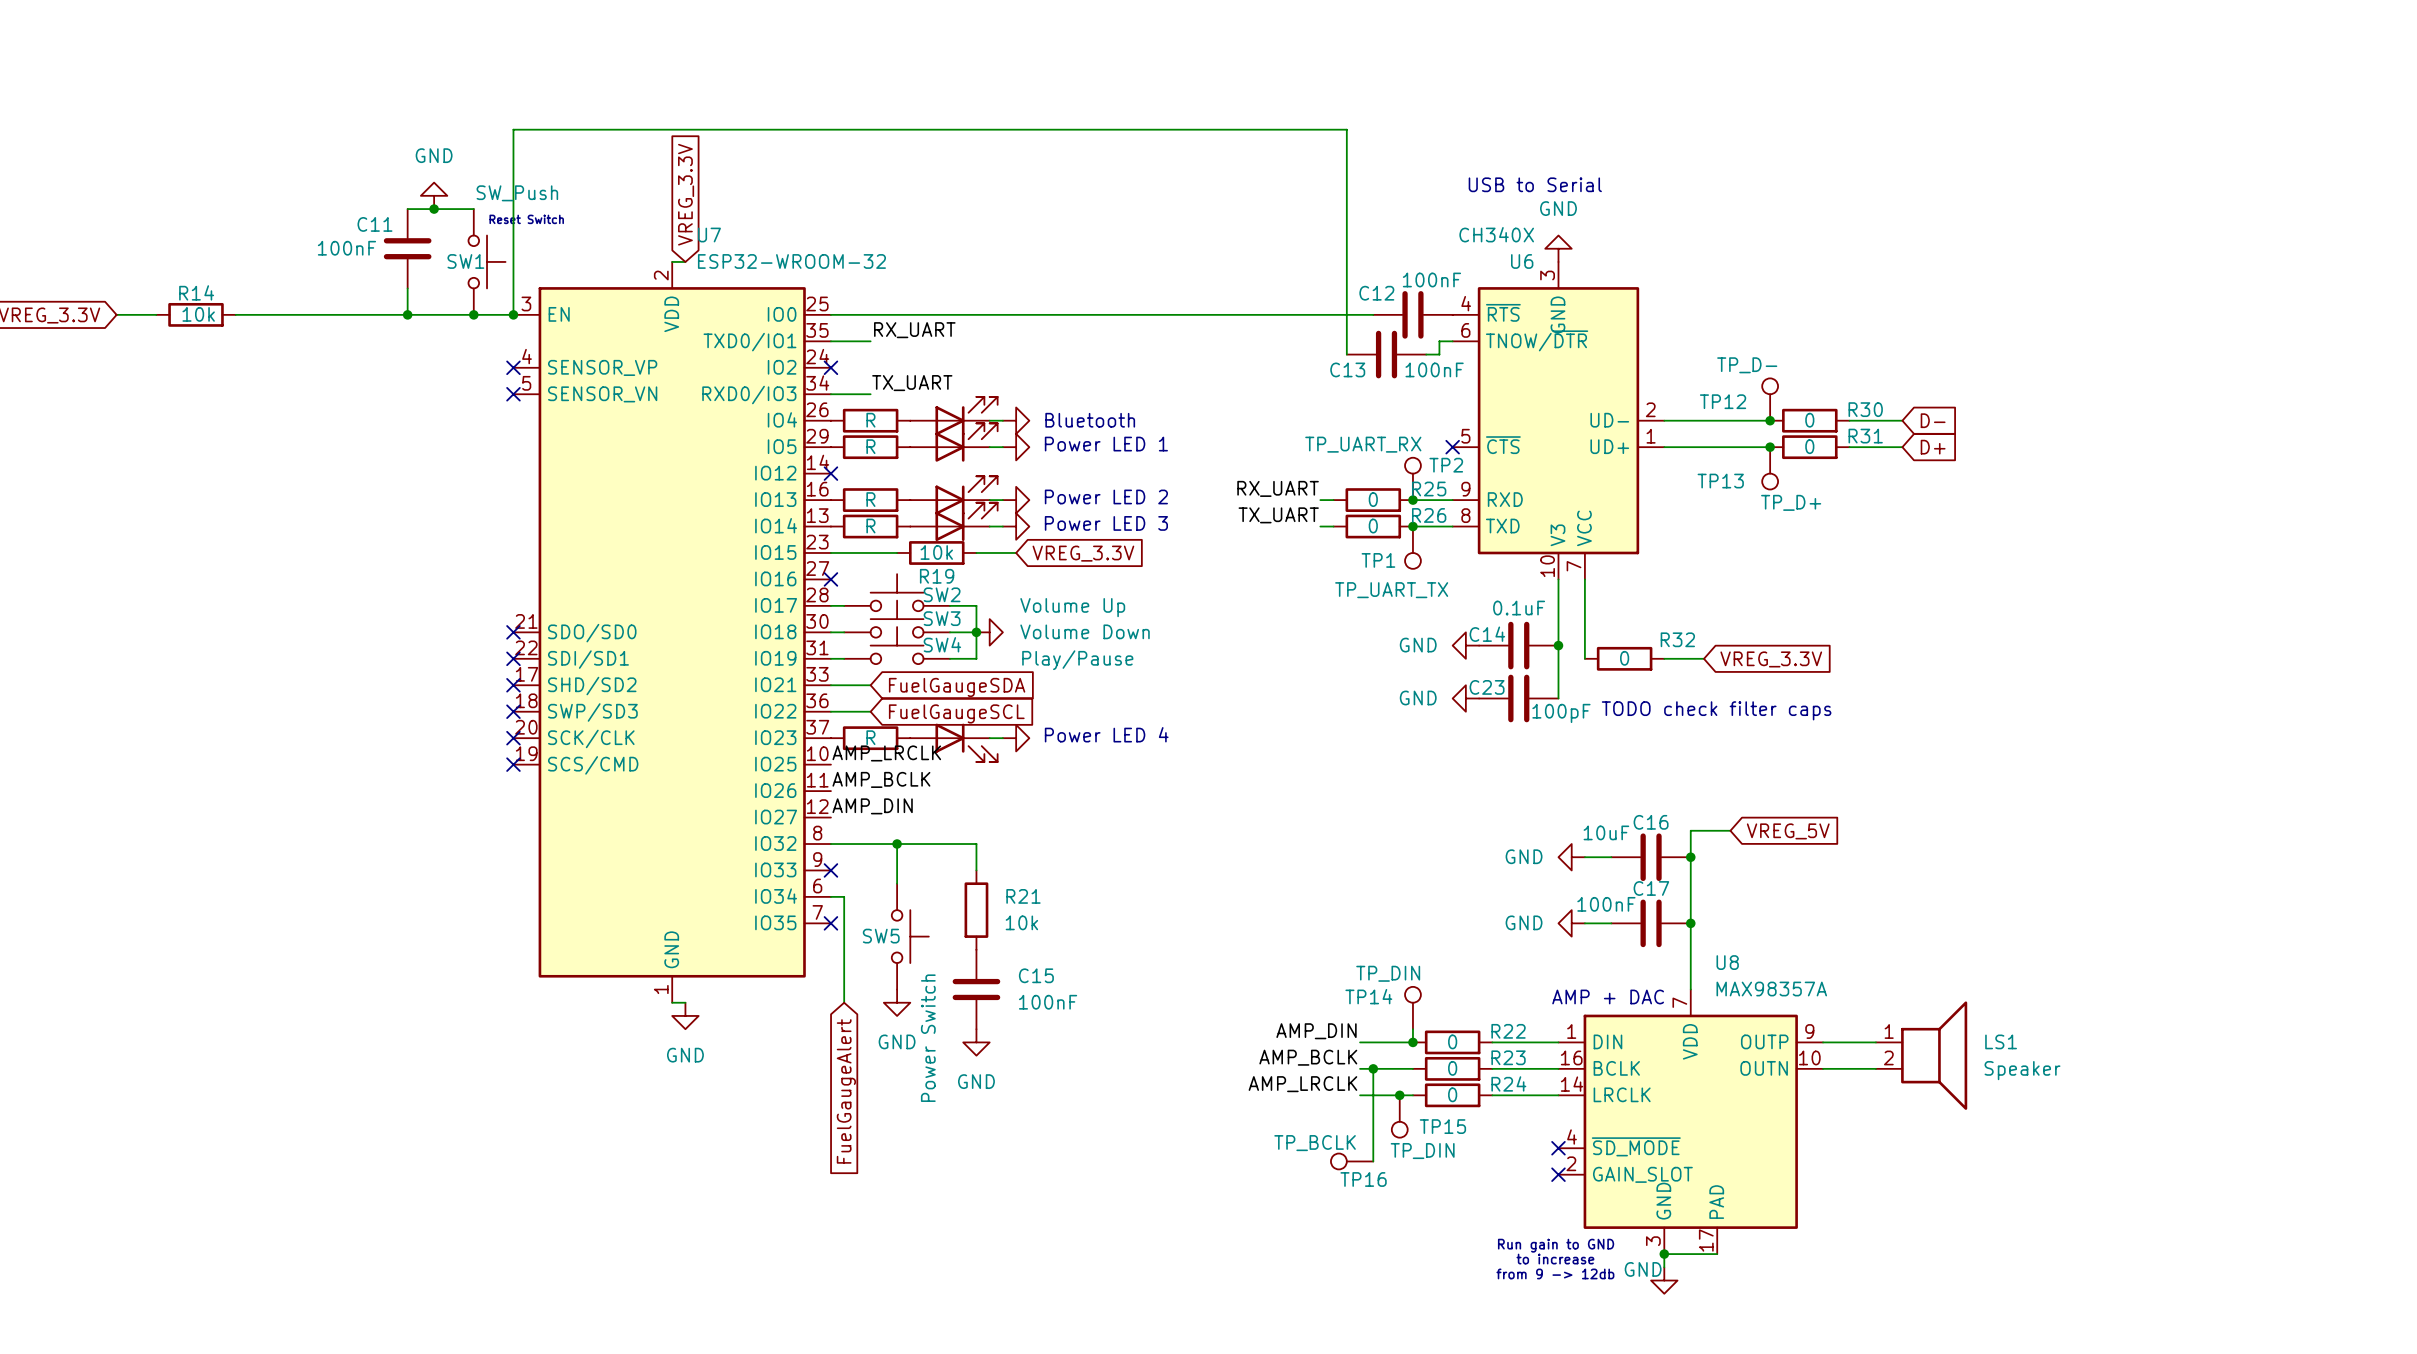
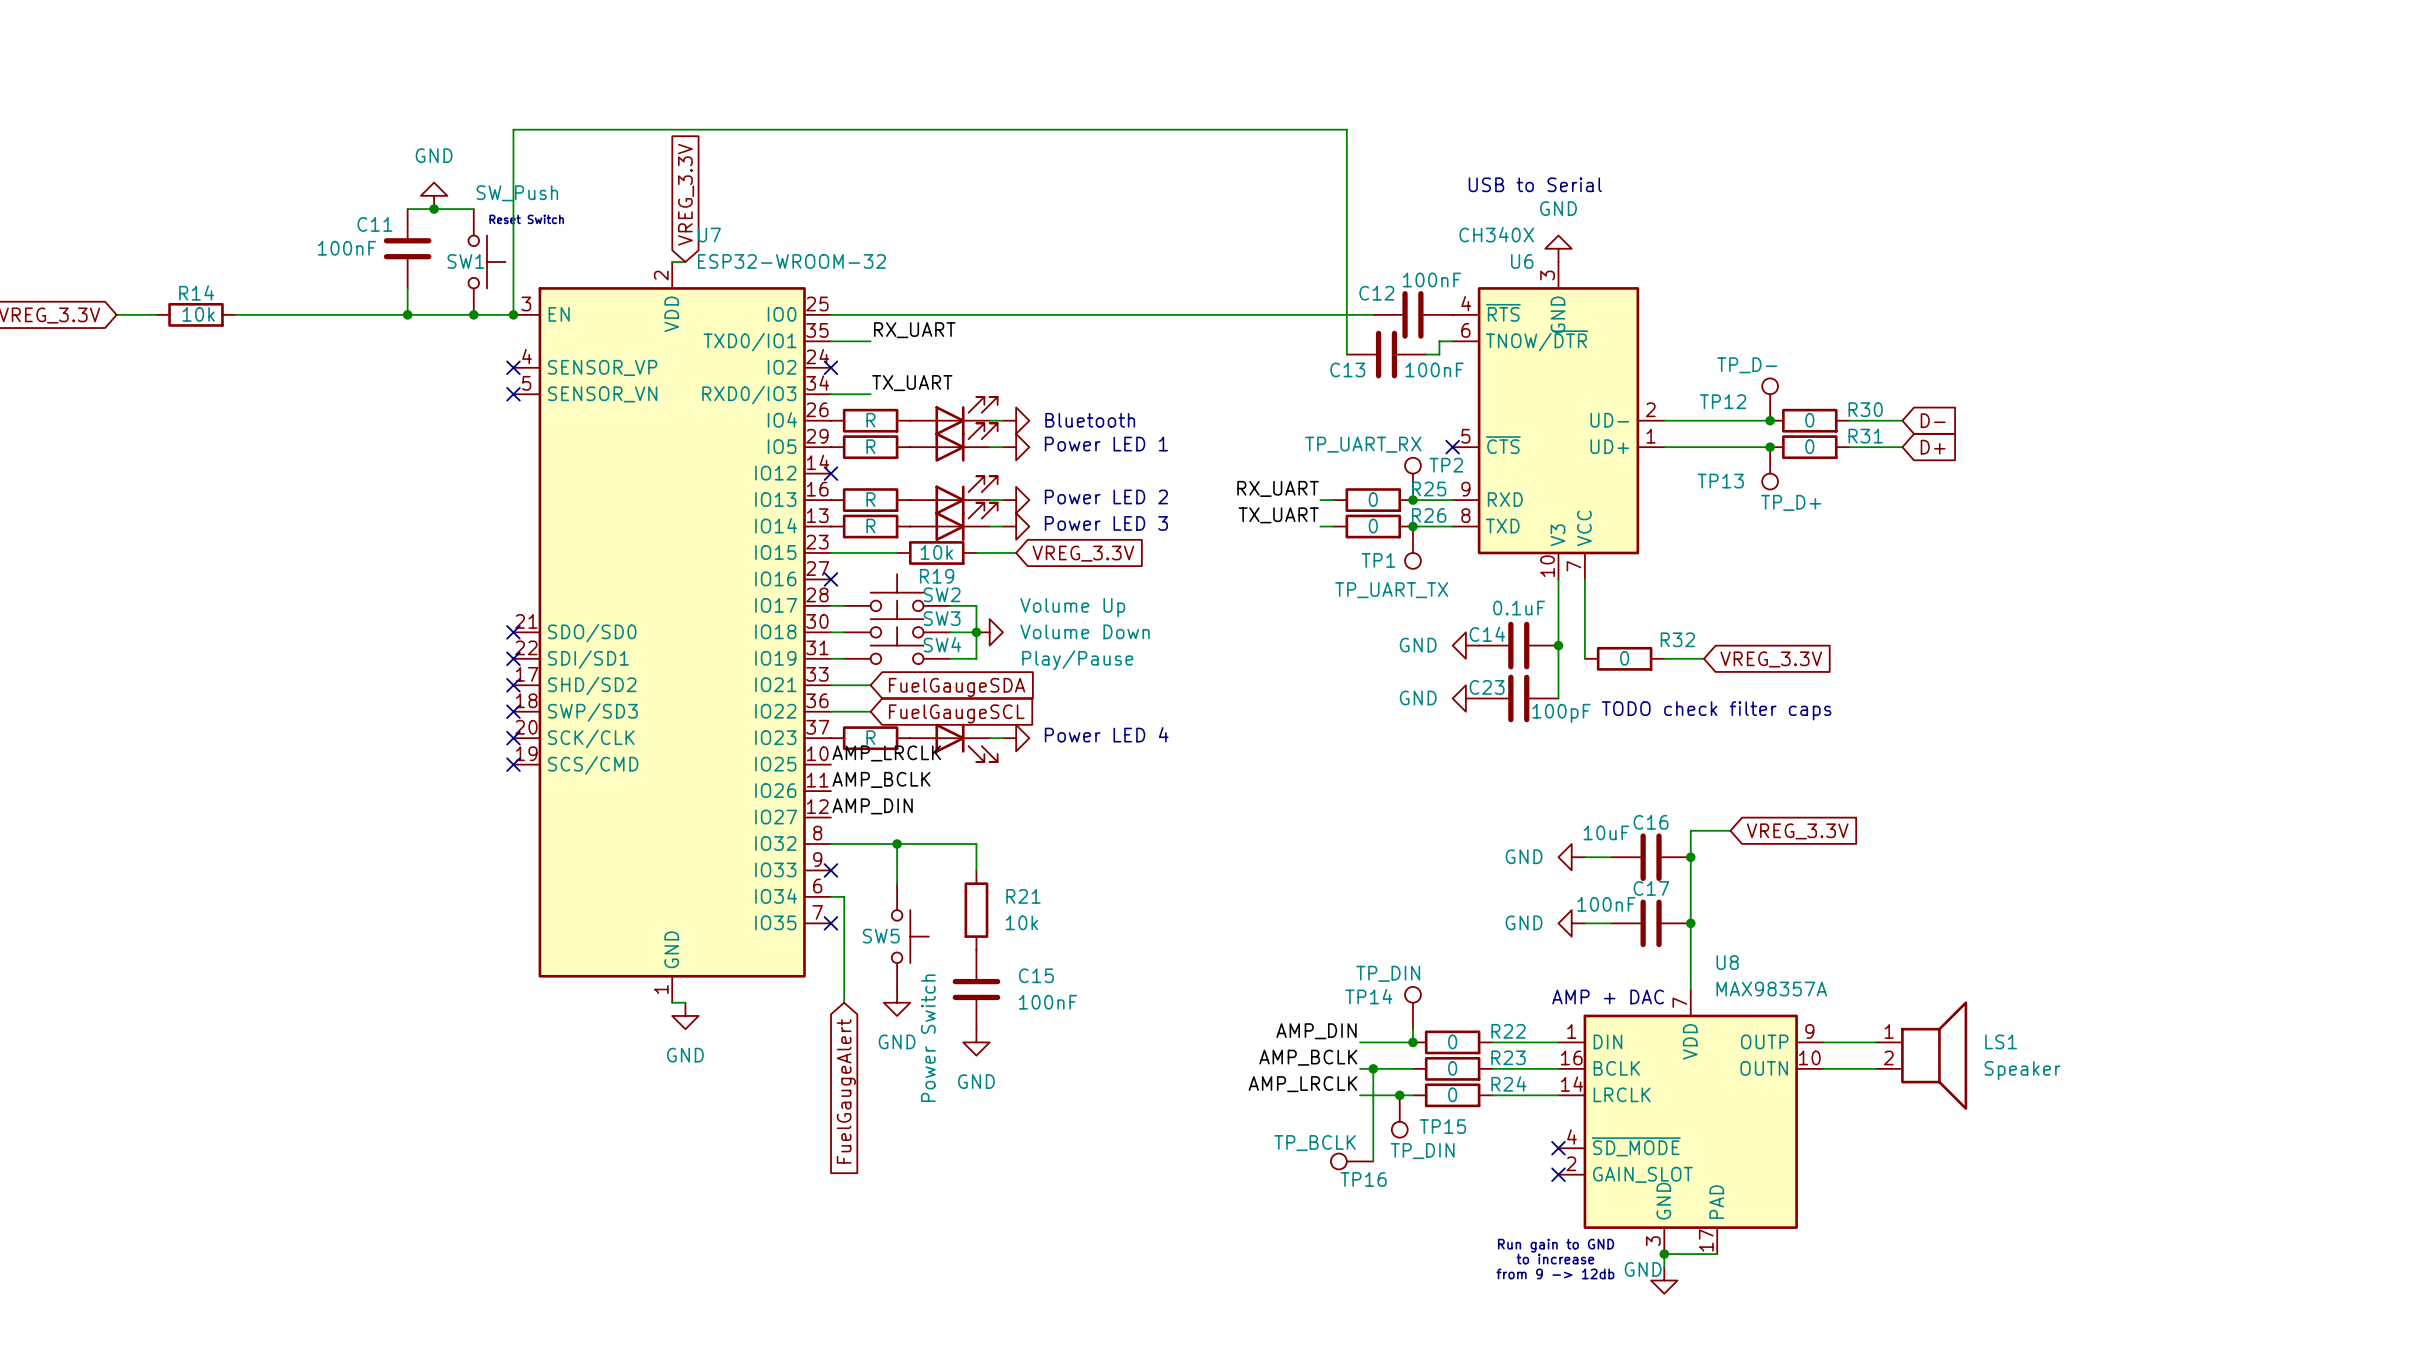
global label: VREG_5V (1788, 831) -> VREG_3.3V (1797, 831)

